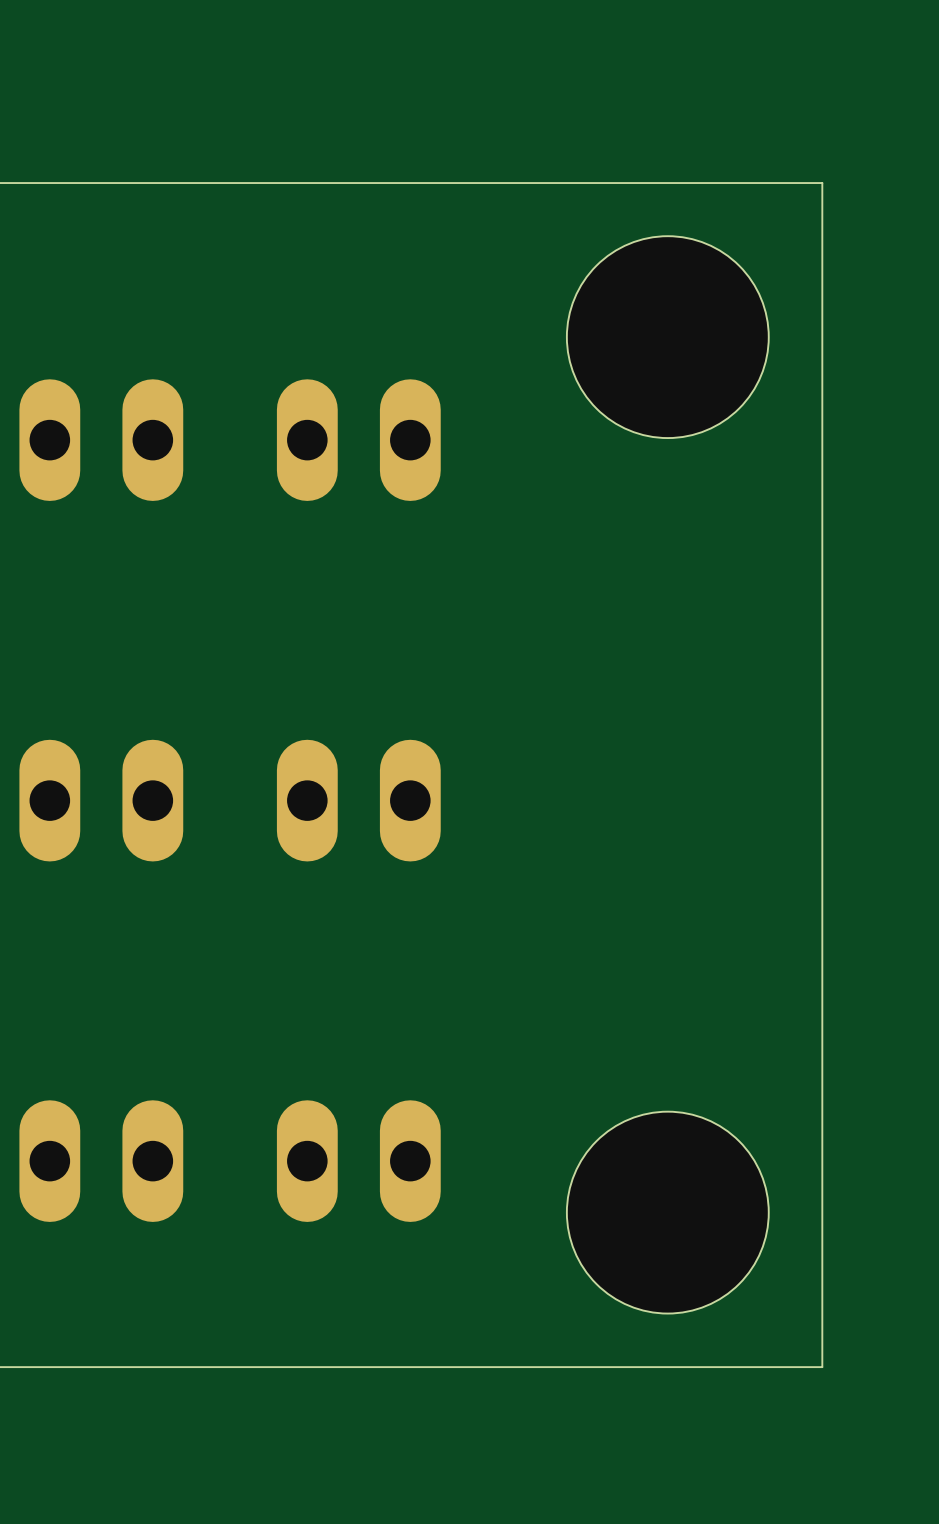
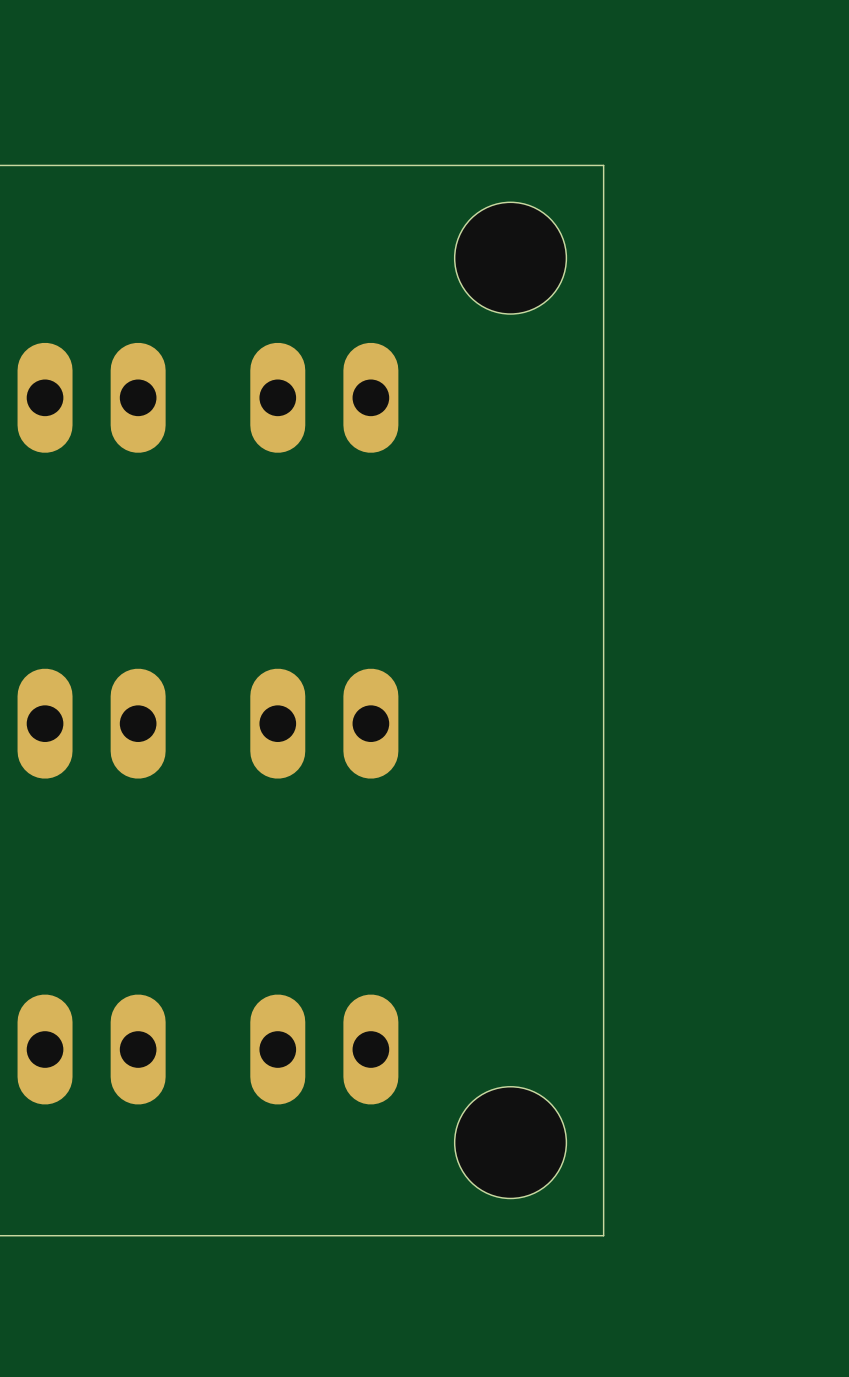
board edge: (667, 183) (822, 183) (822, 1367) (667, 1367) -> (603, 165) (603, 1235)
hole: none -> (510, 258)
hole: (667, 337) -> none
hole: (667, 1212) -> none
hole: none -> (510, 1142)

